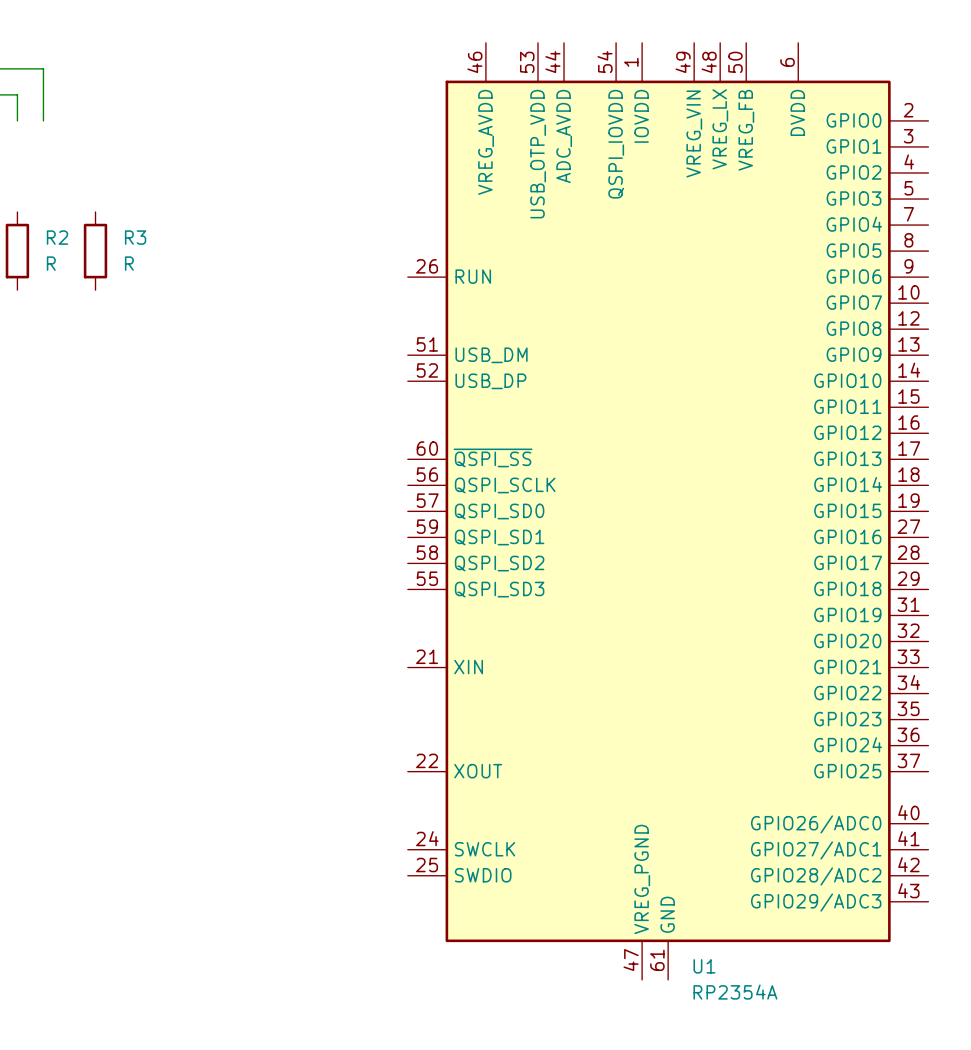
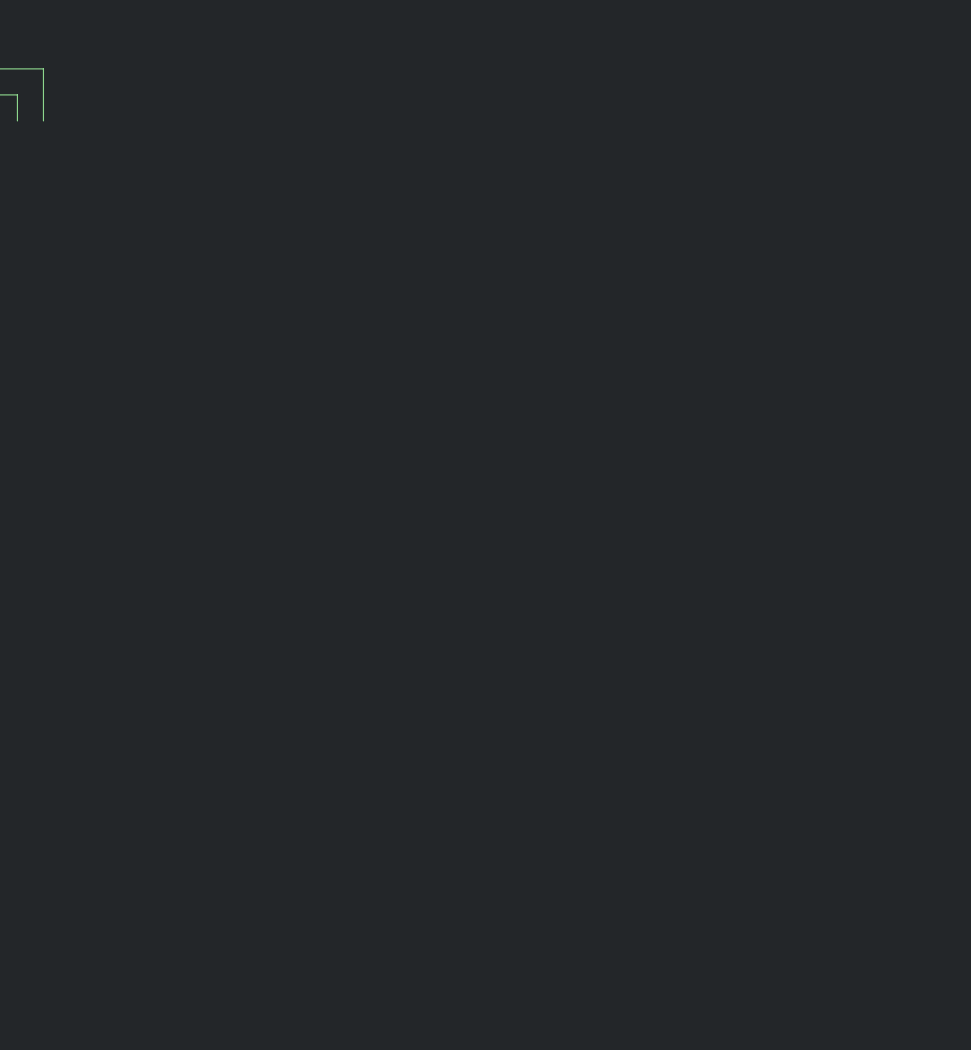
R2: R (17, 251) -> none
R3: R (95, 251) -> none
U1: RP2354A (668, 511) -> none

